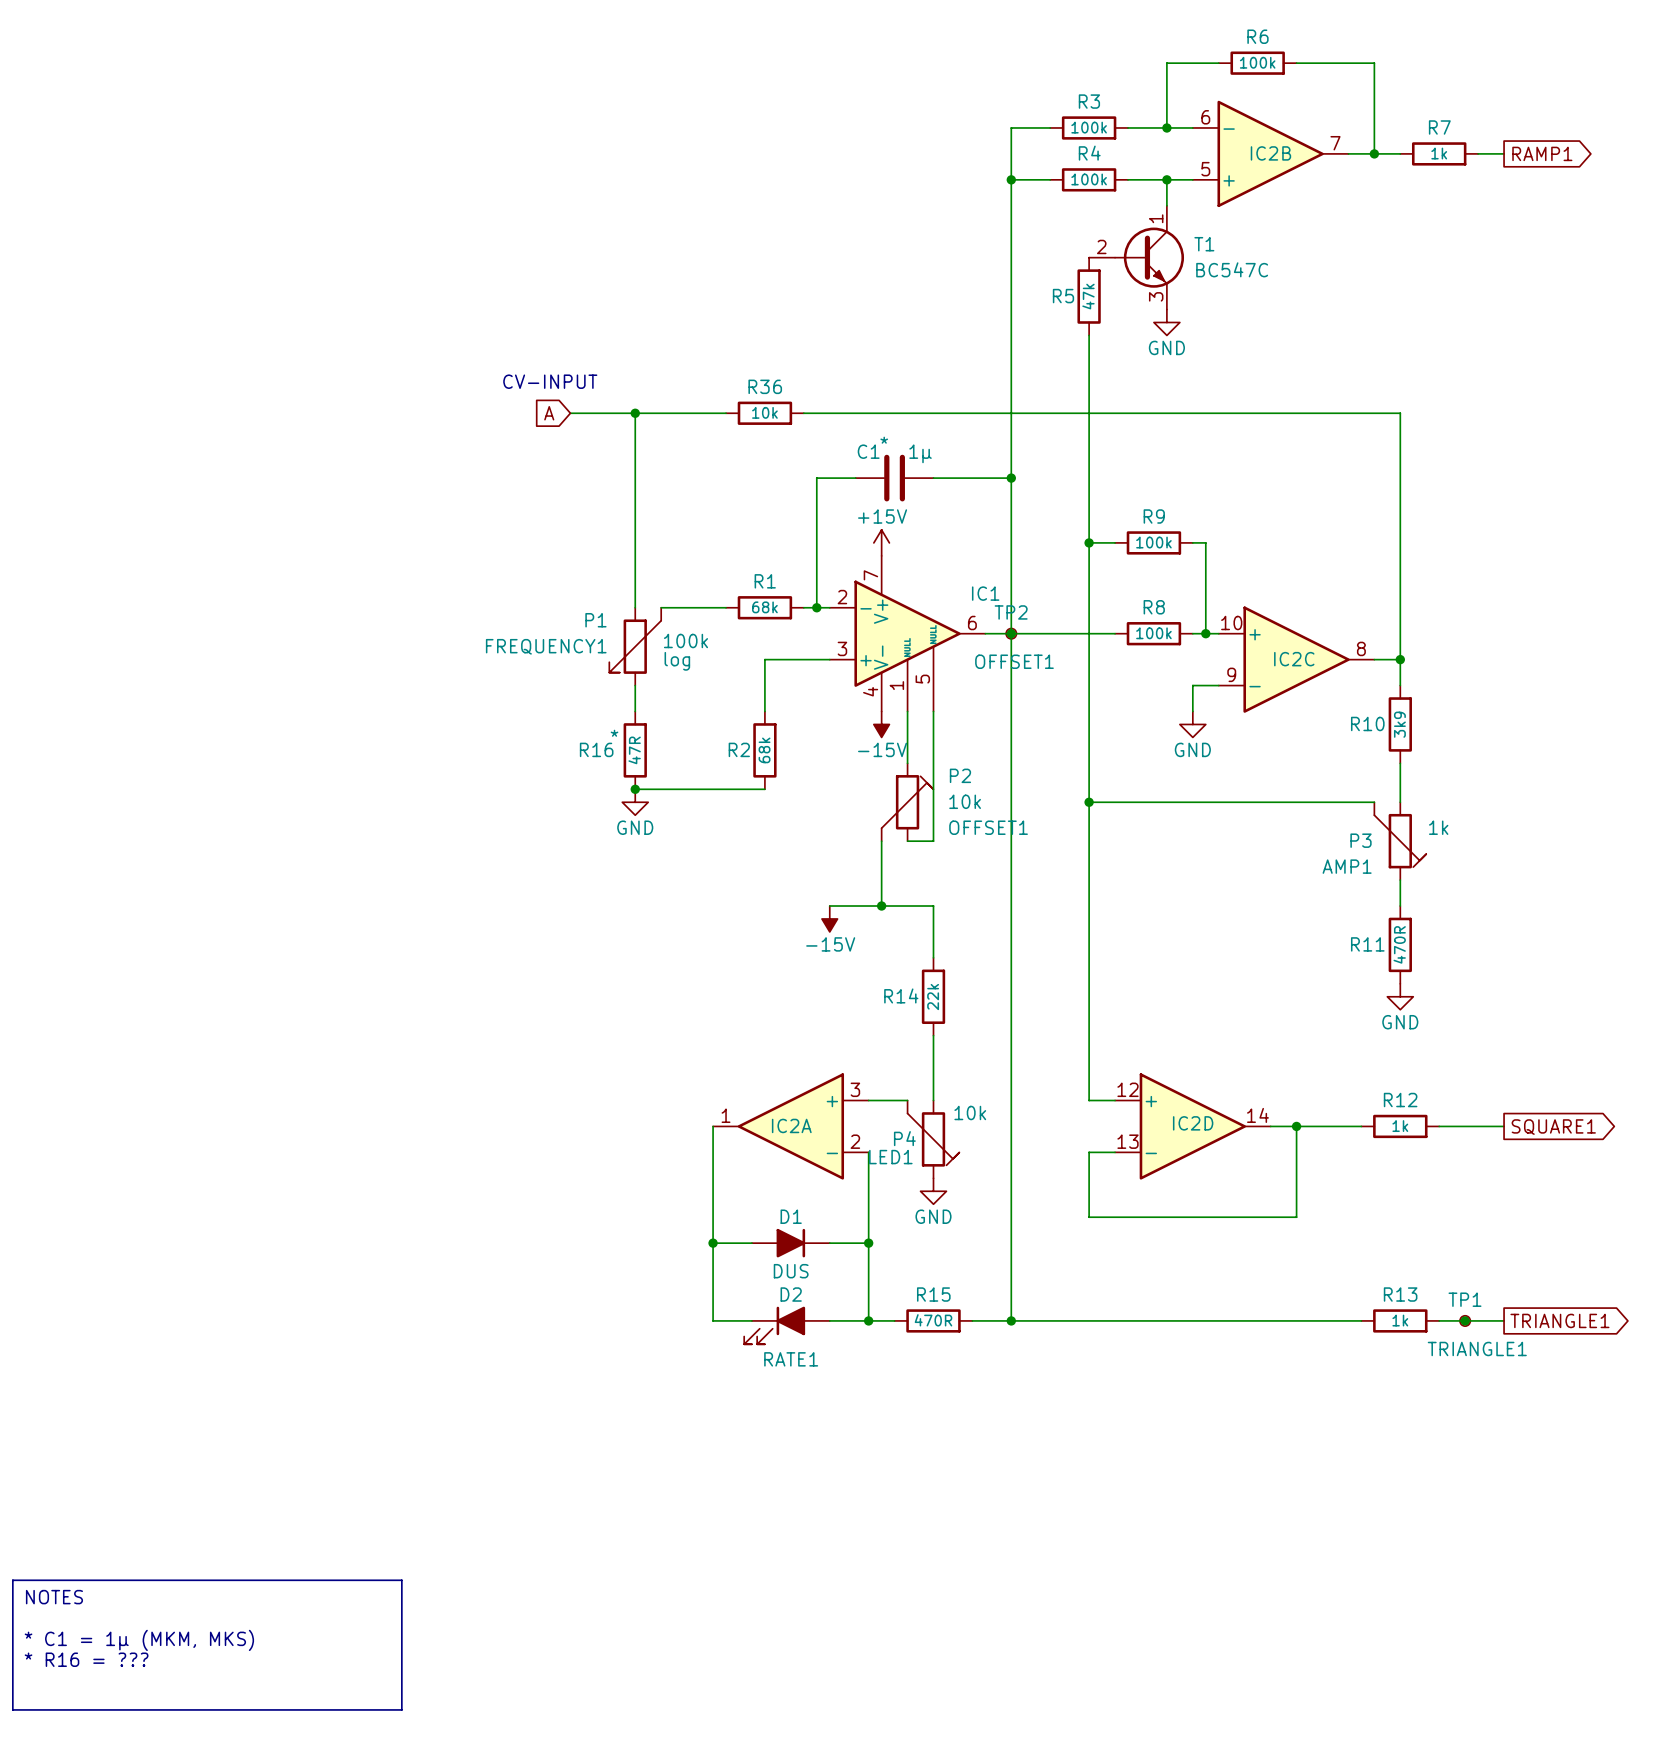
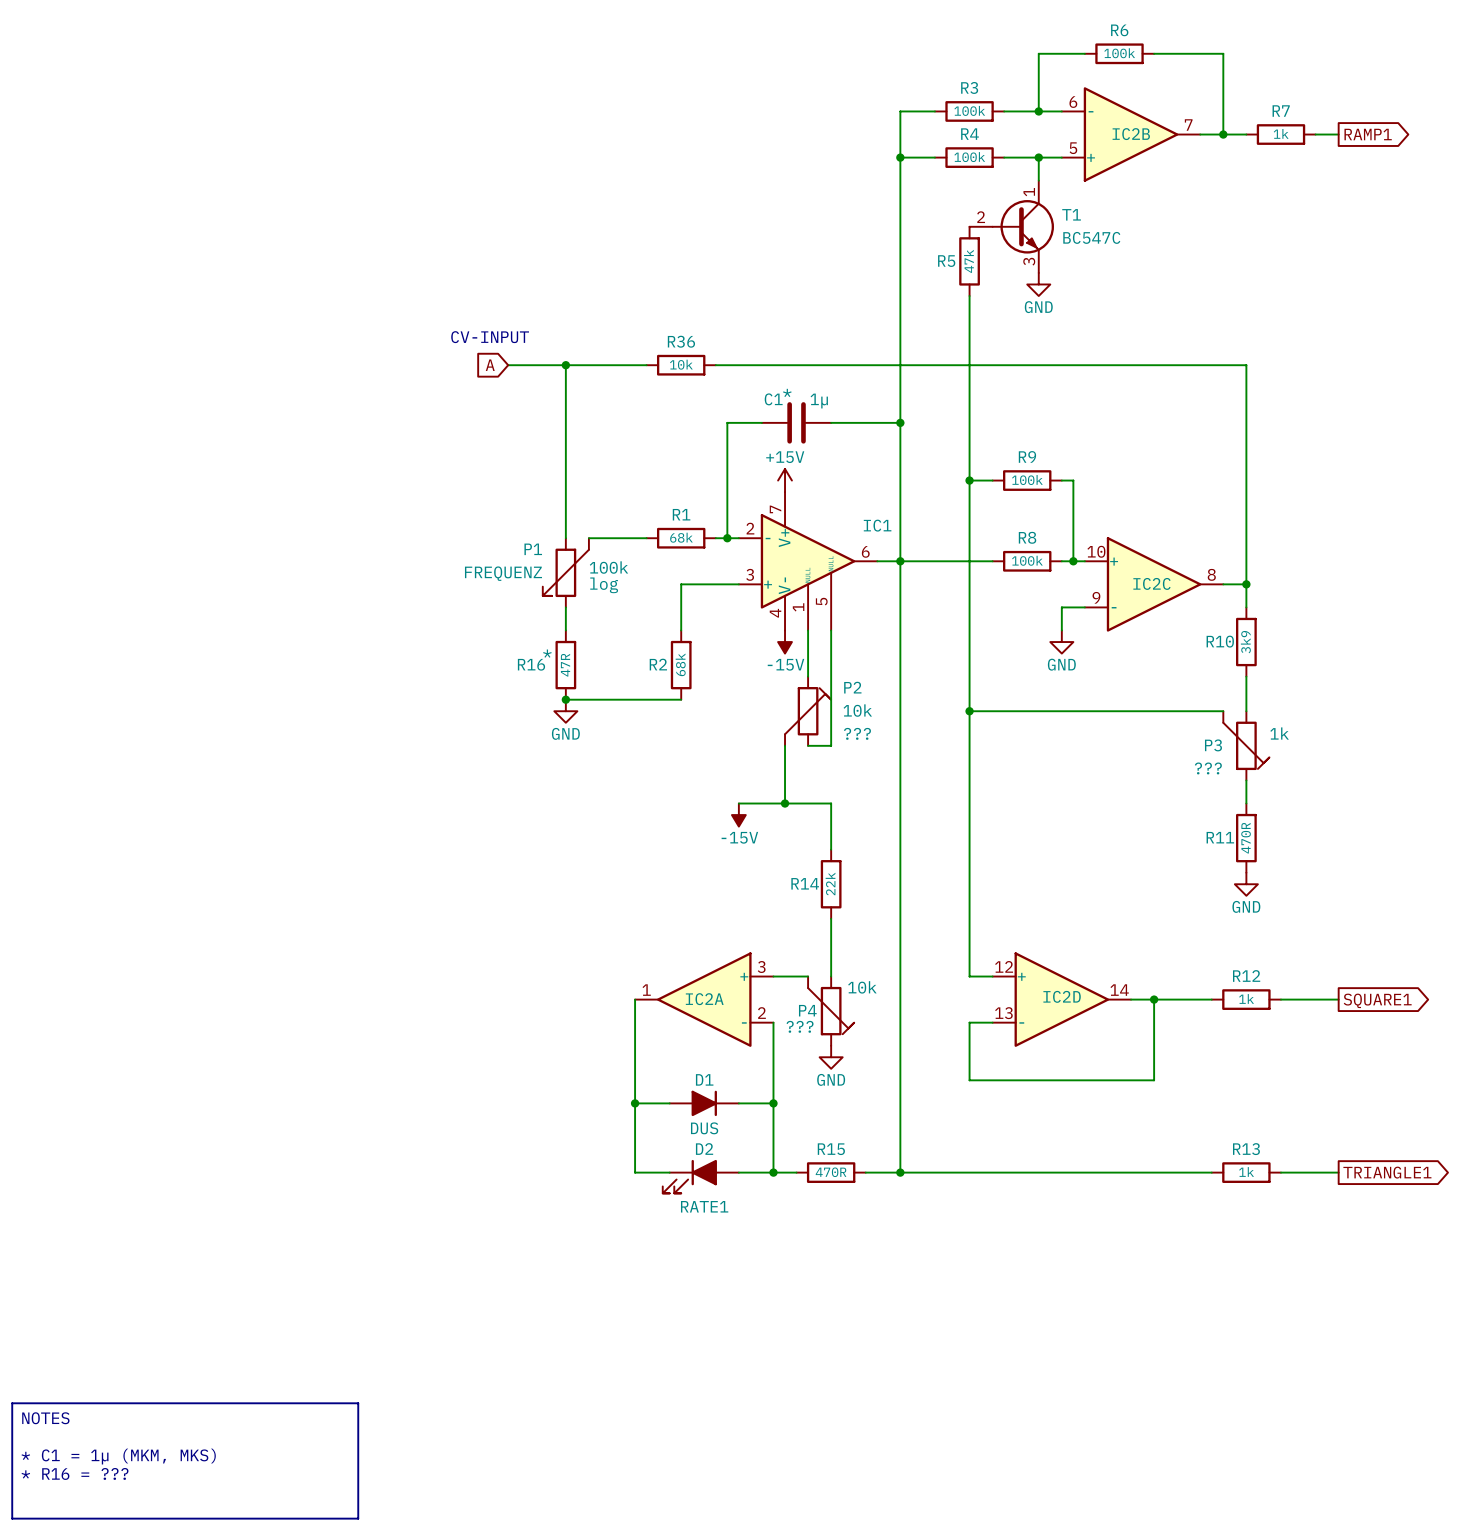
TP2: OFFSET1 (1011, 633) -> none
P1 text: FREQUENCY1 (546, 646) -> FREQUENZ (503, 573)
P2 text: OFFSET1 (988, 827) -> ??? (857, 733)
P3 text: AMP1 (1347, 866) -> ??? (1208, 768)
P4 text: LED1 (890, 1157) -> ??? (800, 1026)
junction: (1465, 1320) -> none
TP1: TRIANGLE1 (1465, 1320) -> none

